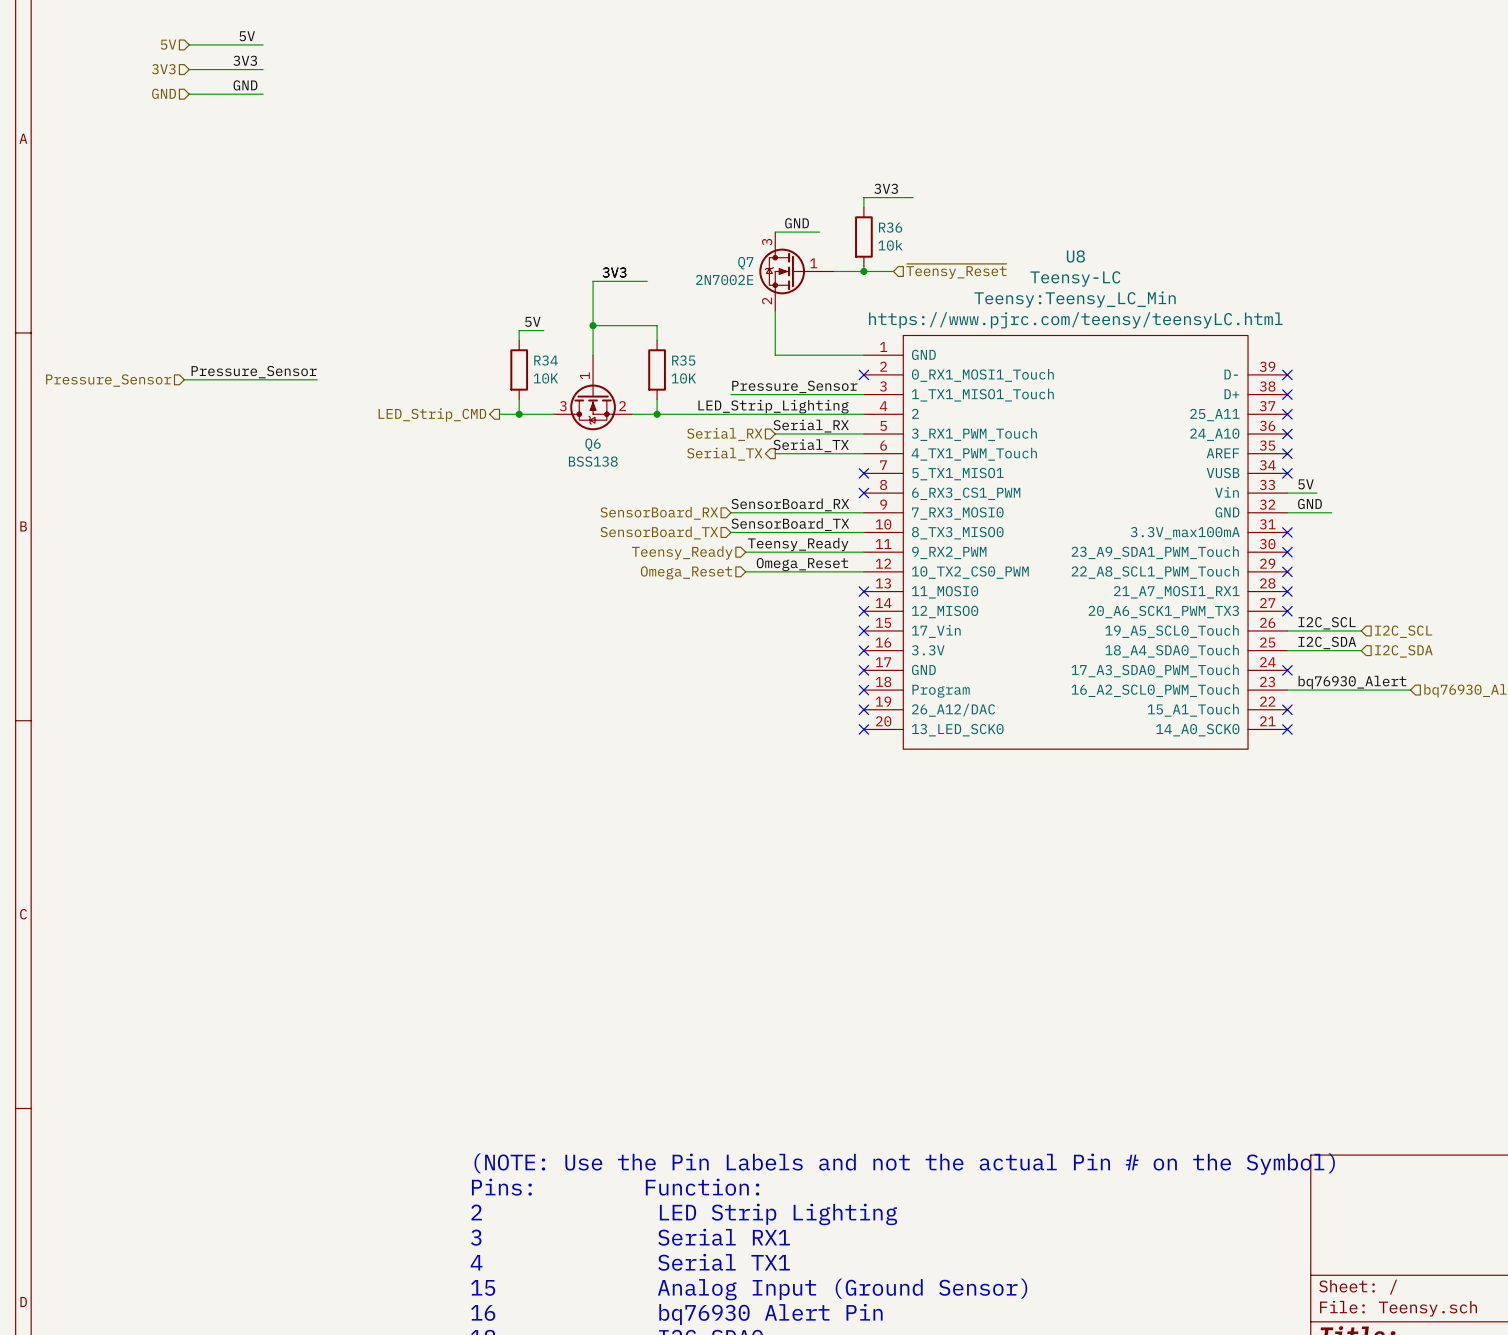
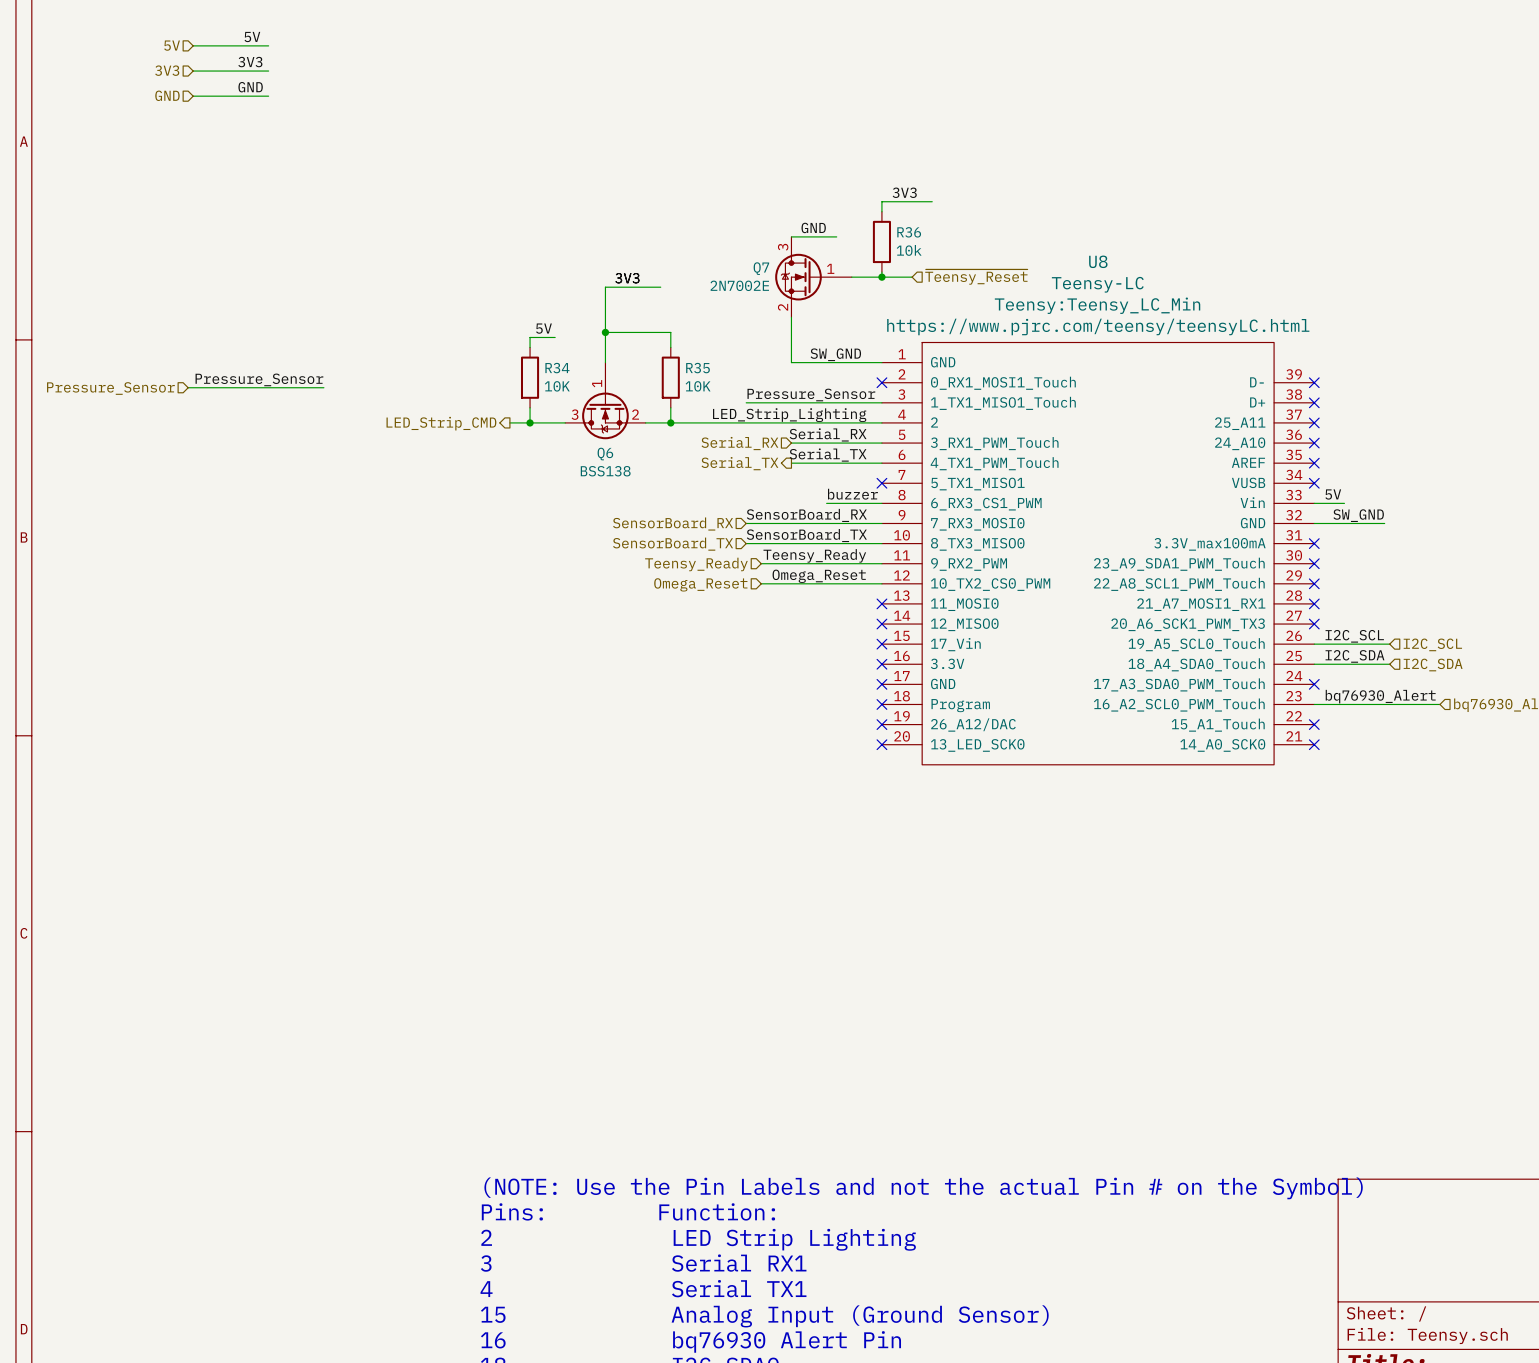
label: none -> SW_GND (835, 354)
label: none -> buzzer (852, 494)
wire: none -> (826, 503) (881, 503)
no-connect mark: (863, 493) -> none
label: GND (1309, 503) -> SW_GND (1358, 515)
wire: none -> (1359, 523) (1384, 523)

